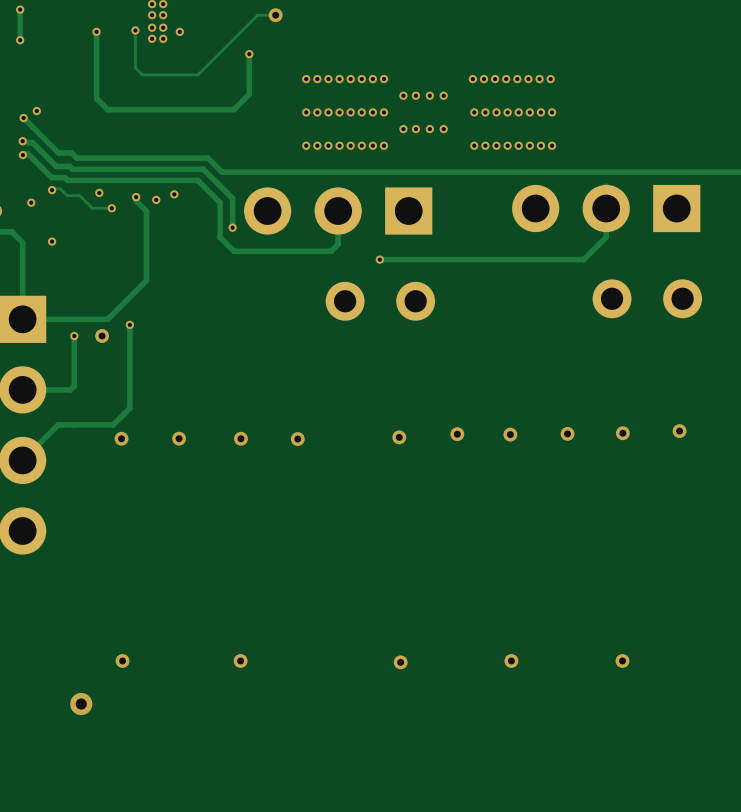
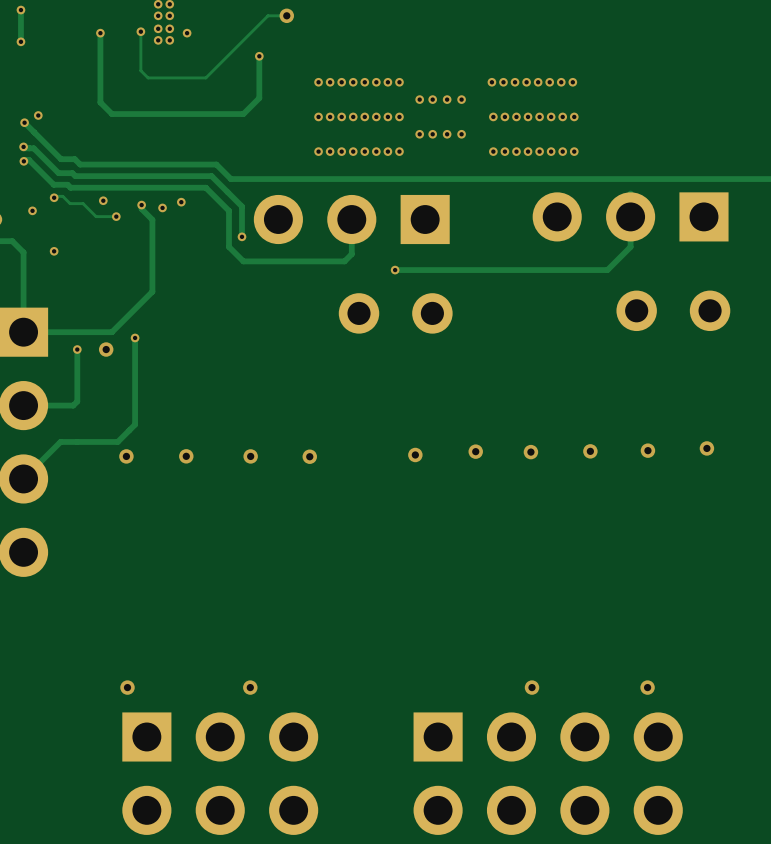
via: (400, 662) -> none
via: (81, 704) -> none
part: none -> (220, 773)
part: none -> (548, 773)

